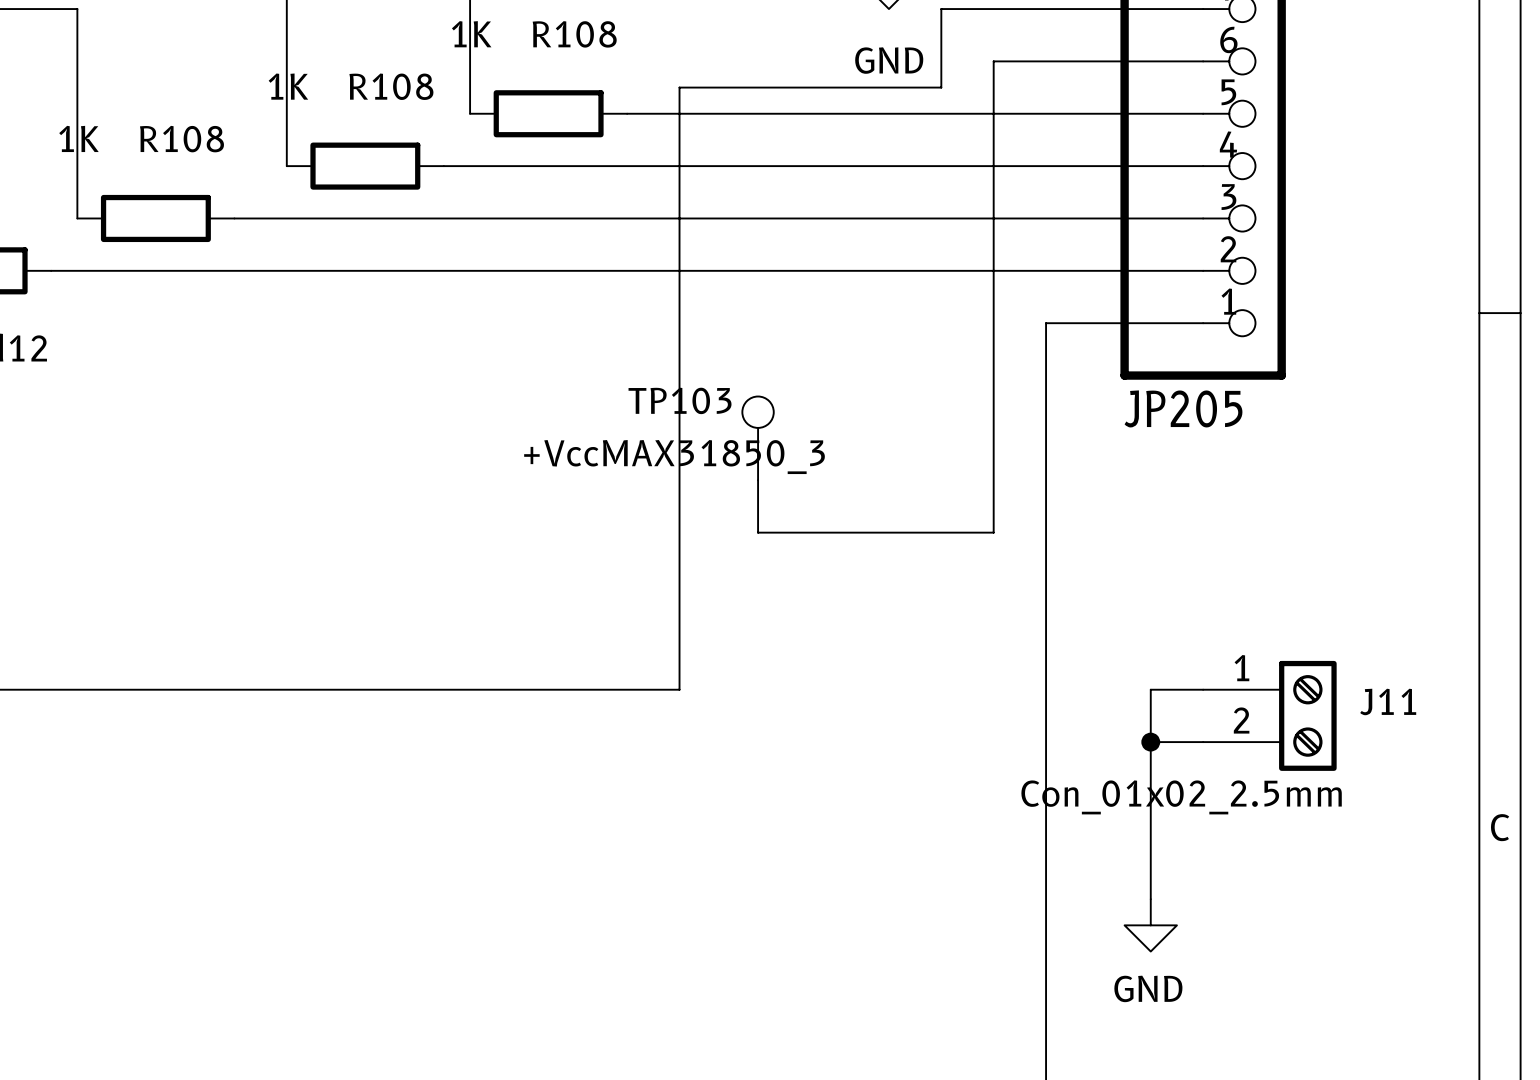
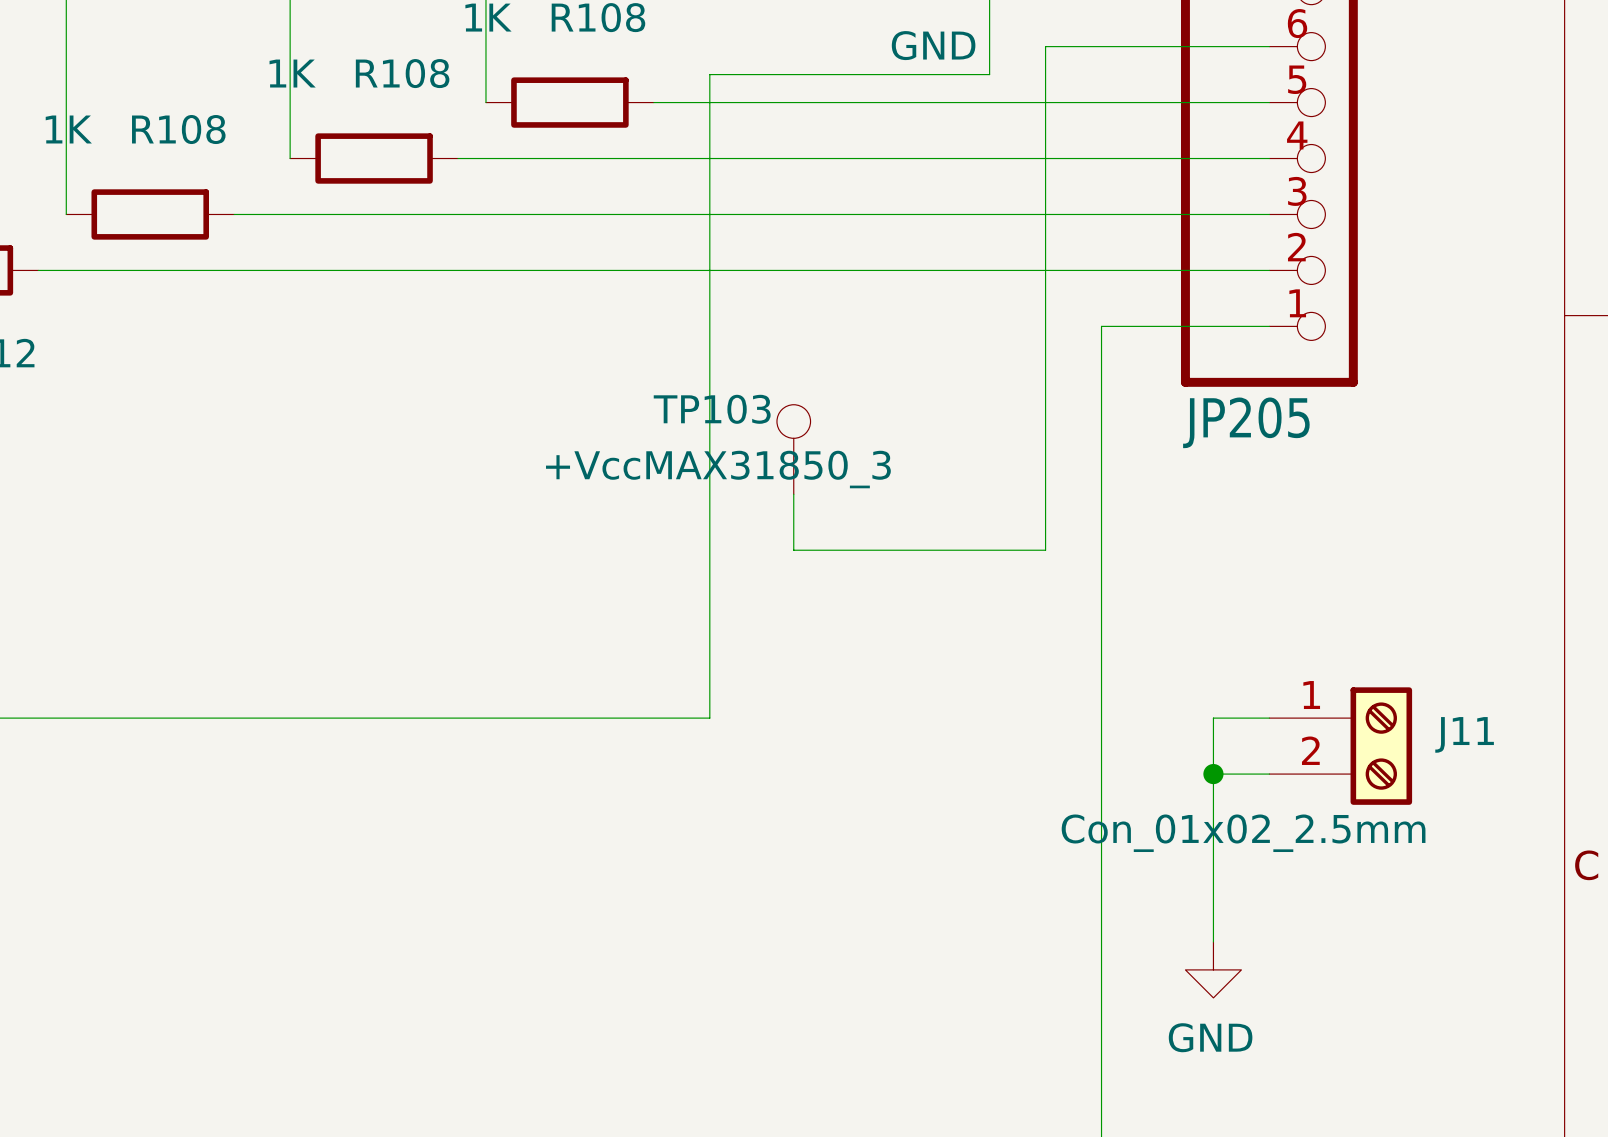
J11 value position: Con_01x02_2.5mm (1181, 797) -> Con_01x02_2.5mm (1243, 833)

